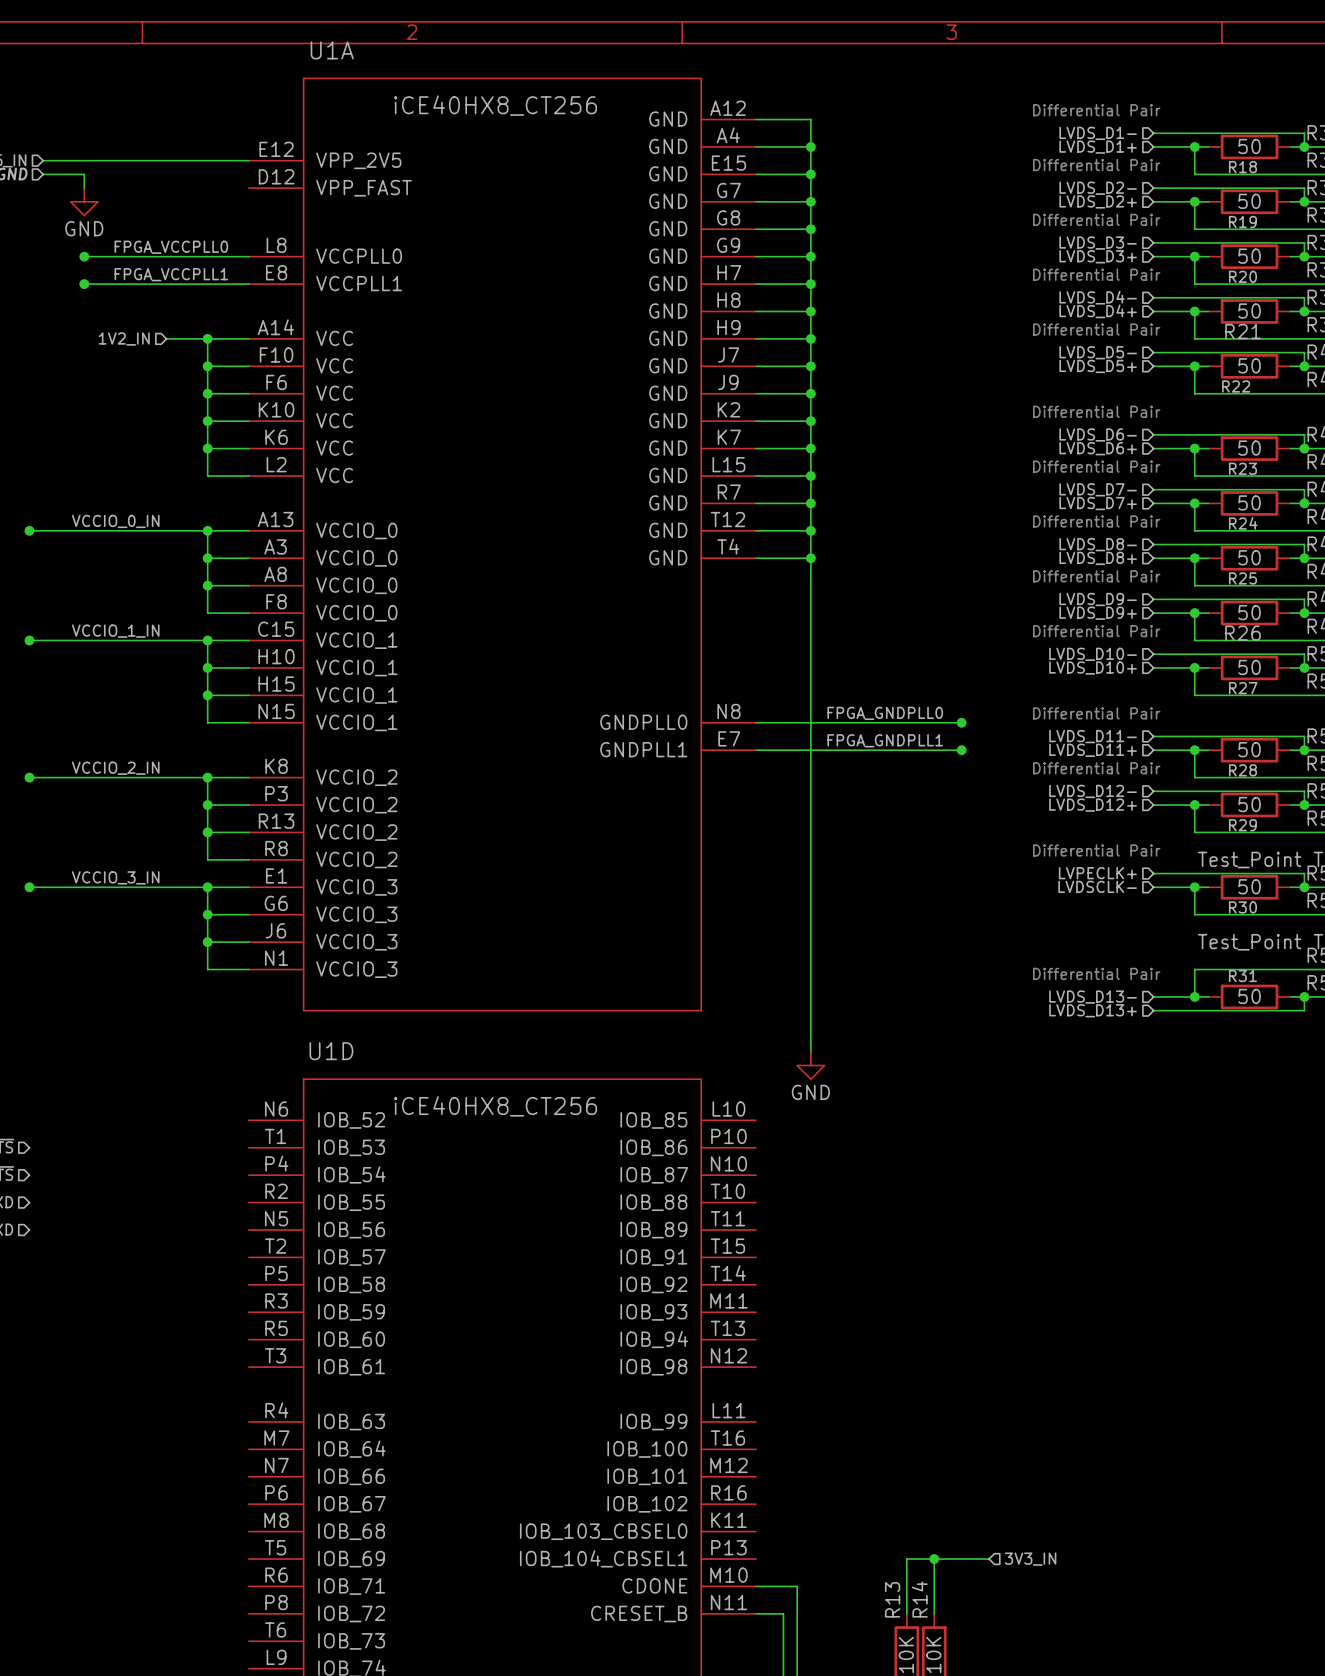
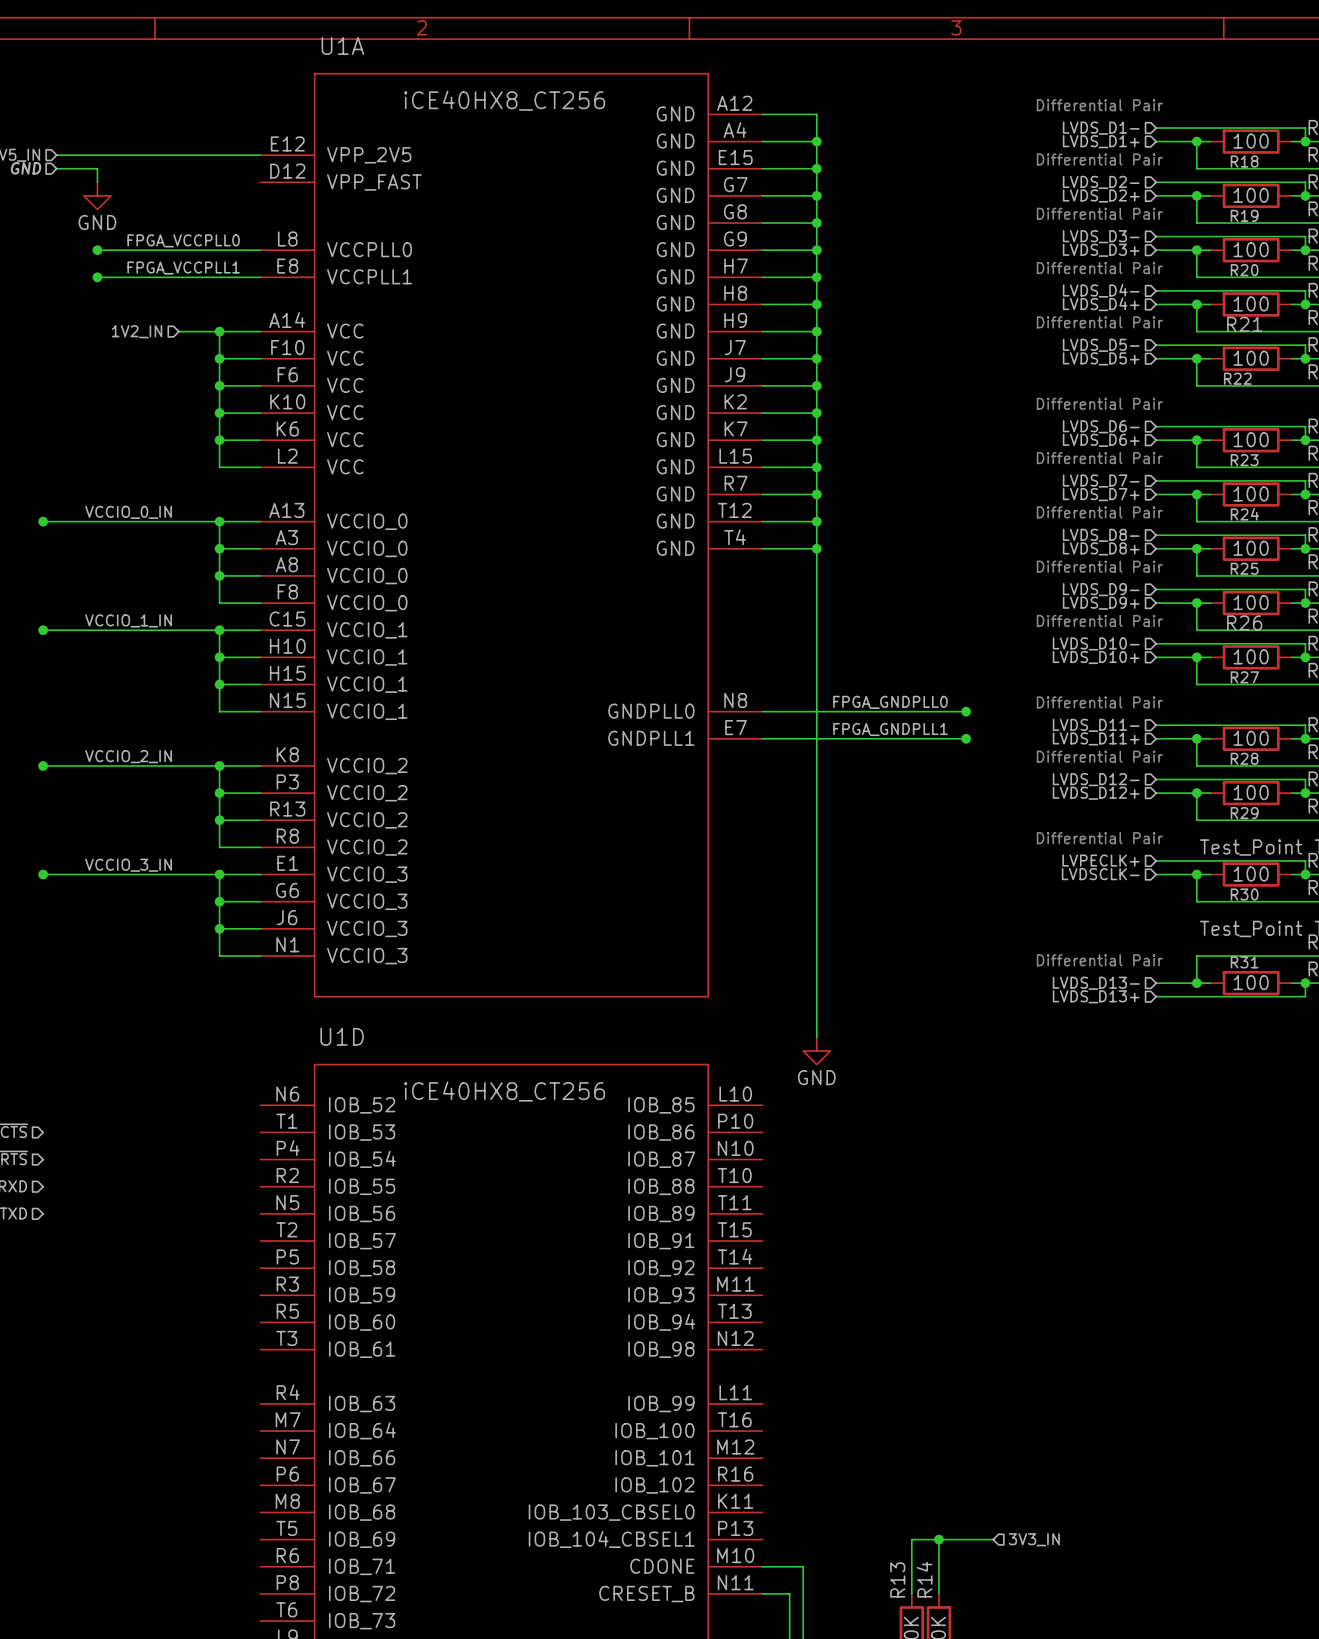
R18 value: 50 (1249, 146) -> 100 (1251, 141)
R19 value: 50 (1249, 201) -> 100 (1251, 195)
R20 value: 50 (1249, 256) -> 100 (1251, 249)
R21 value: 50 (1249, 310) -> 100 (1251, 303)
R22 value: 50 (1249, 365) -> 100 (1251, 358)
R23 value: 50 (1249, 448) -> 100 (1251, 439)
R24 value: 50 (1249, 502) -> 100 (1251, 493)
R25 value: 50 (1249, 557) -> 100 (1251, 548)
R26 value: 50 (1249, 612) -> 100 (1251, 602)
R27 value: 50 (1249, 667) -> 100 (1251, 656)
R28 value: 50 (1249, 749) -> 100 (1251, 738)
R29 value: 50 (1249, 804) -> 100 (1251, 792)
R30 value: 50 (1249, 886) -> 100 (1251, 874)
R31 value: 50 (1249, 996) -> 100 (1251, 982)

